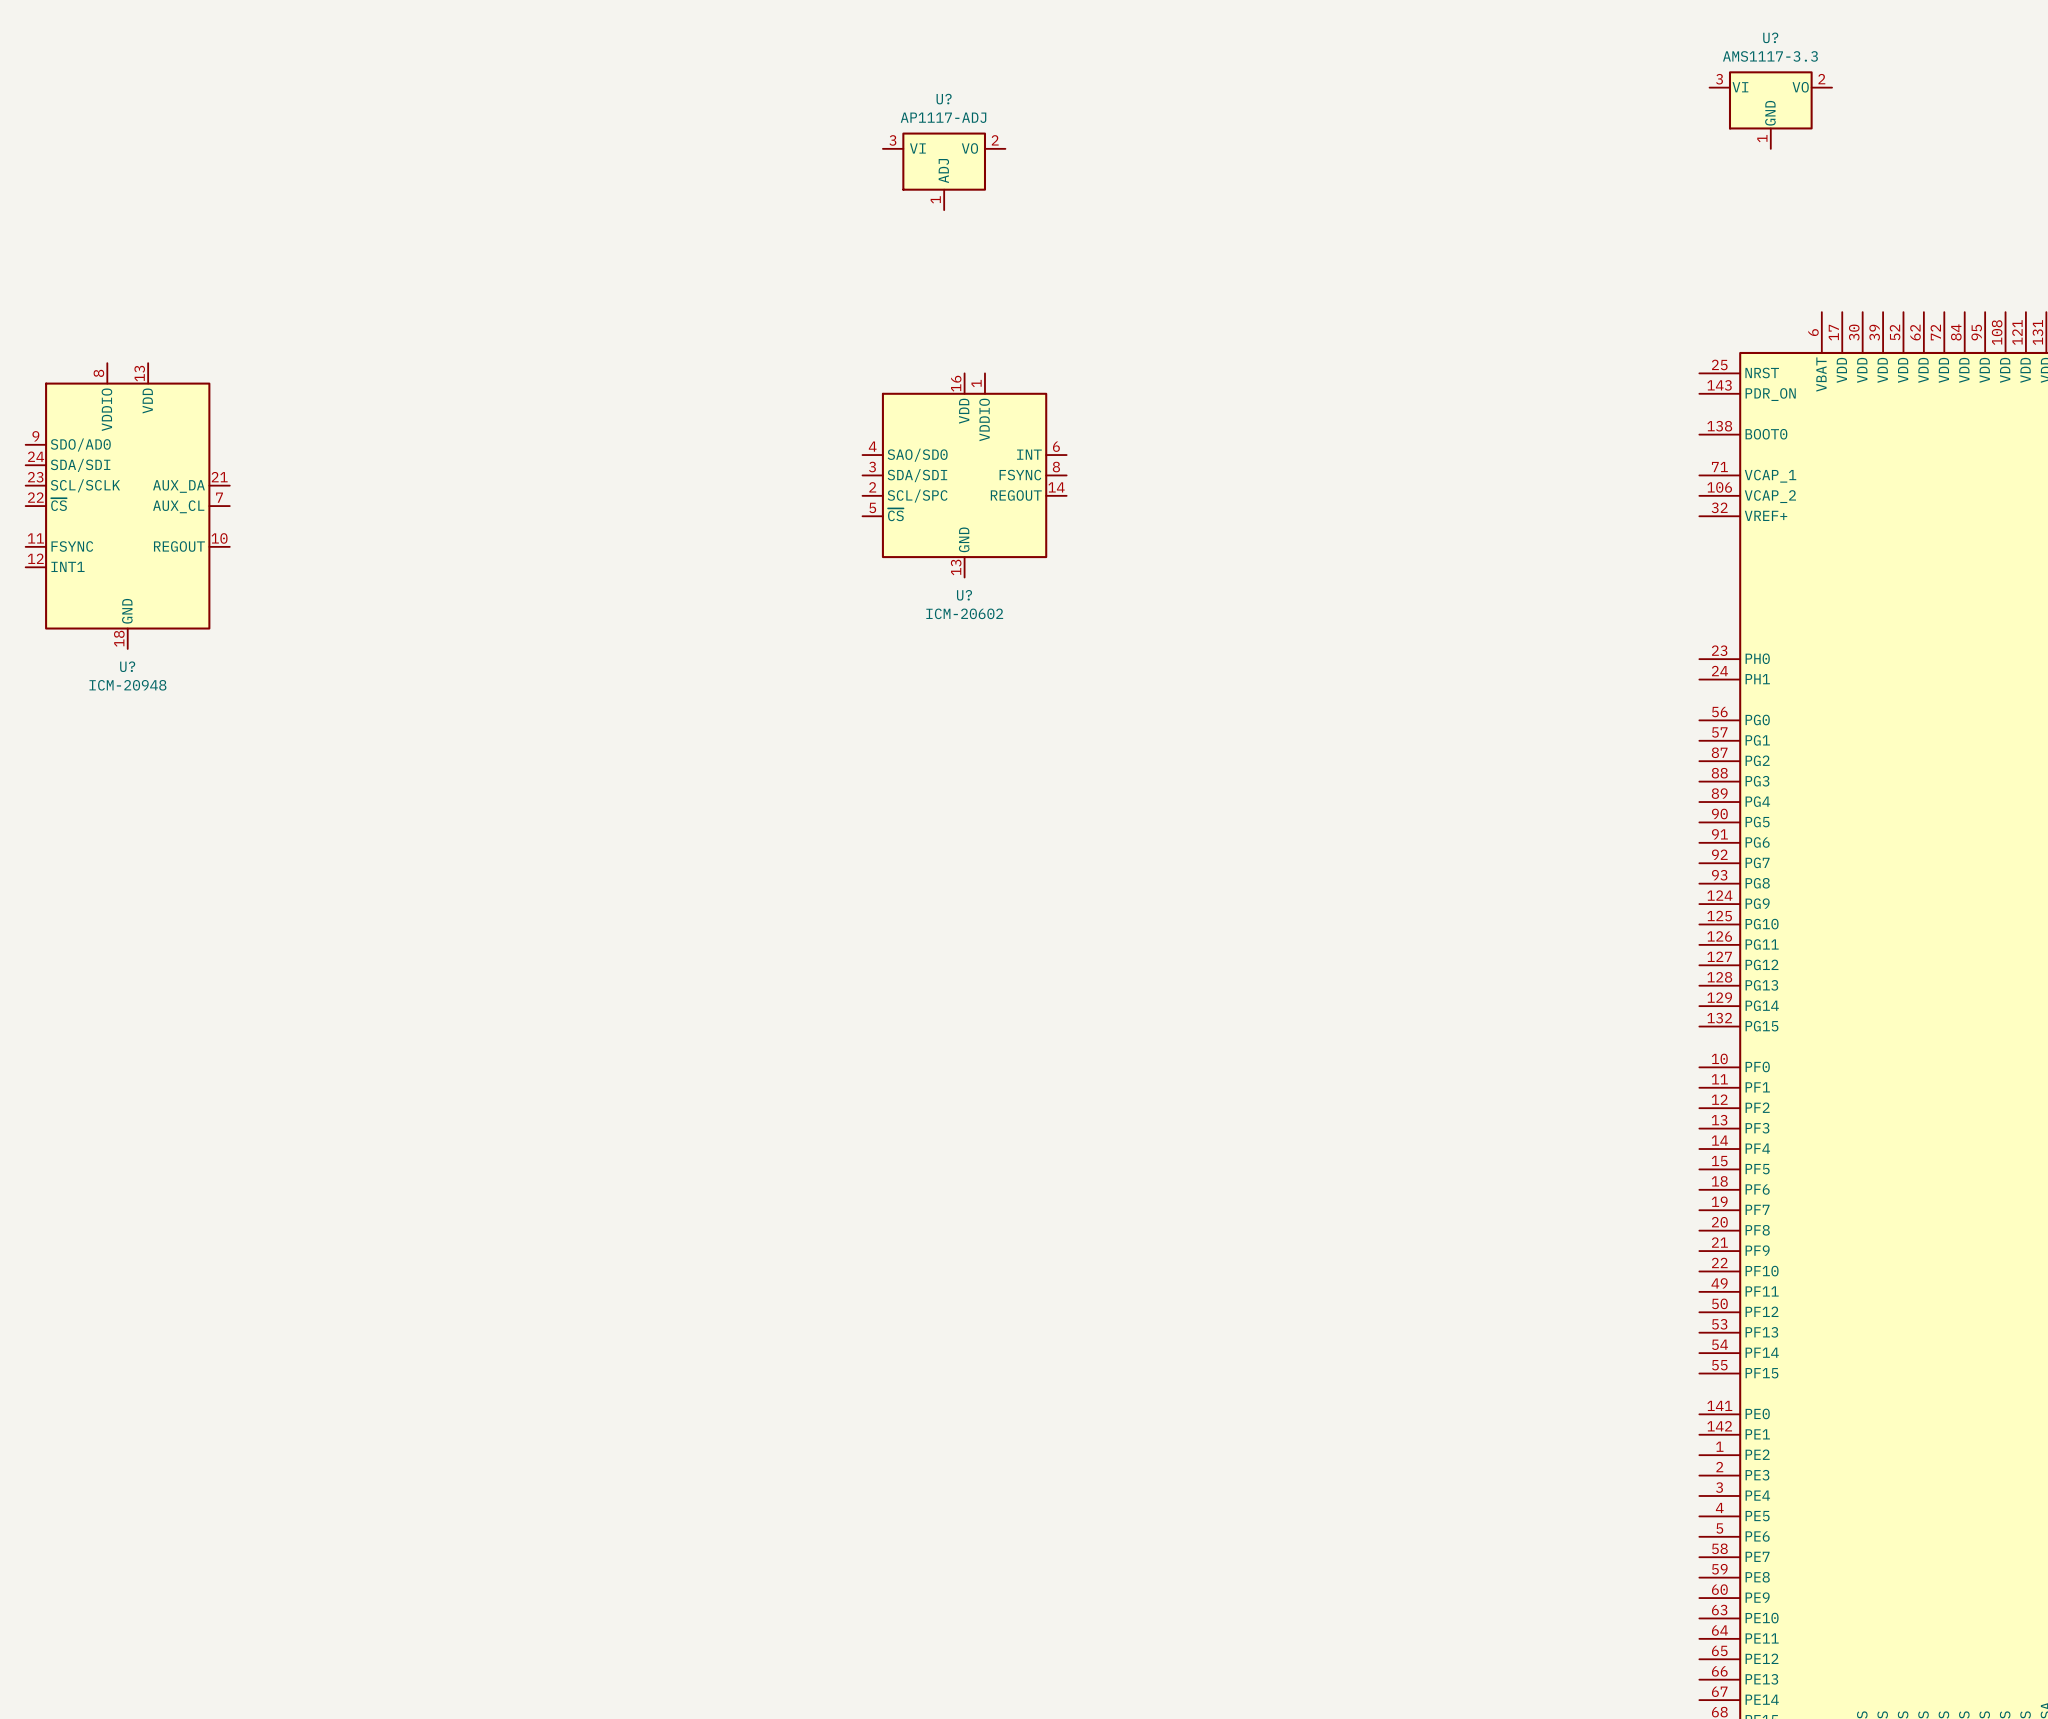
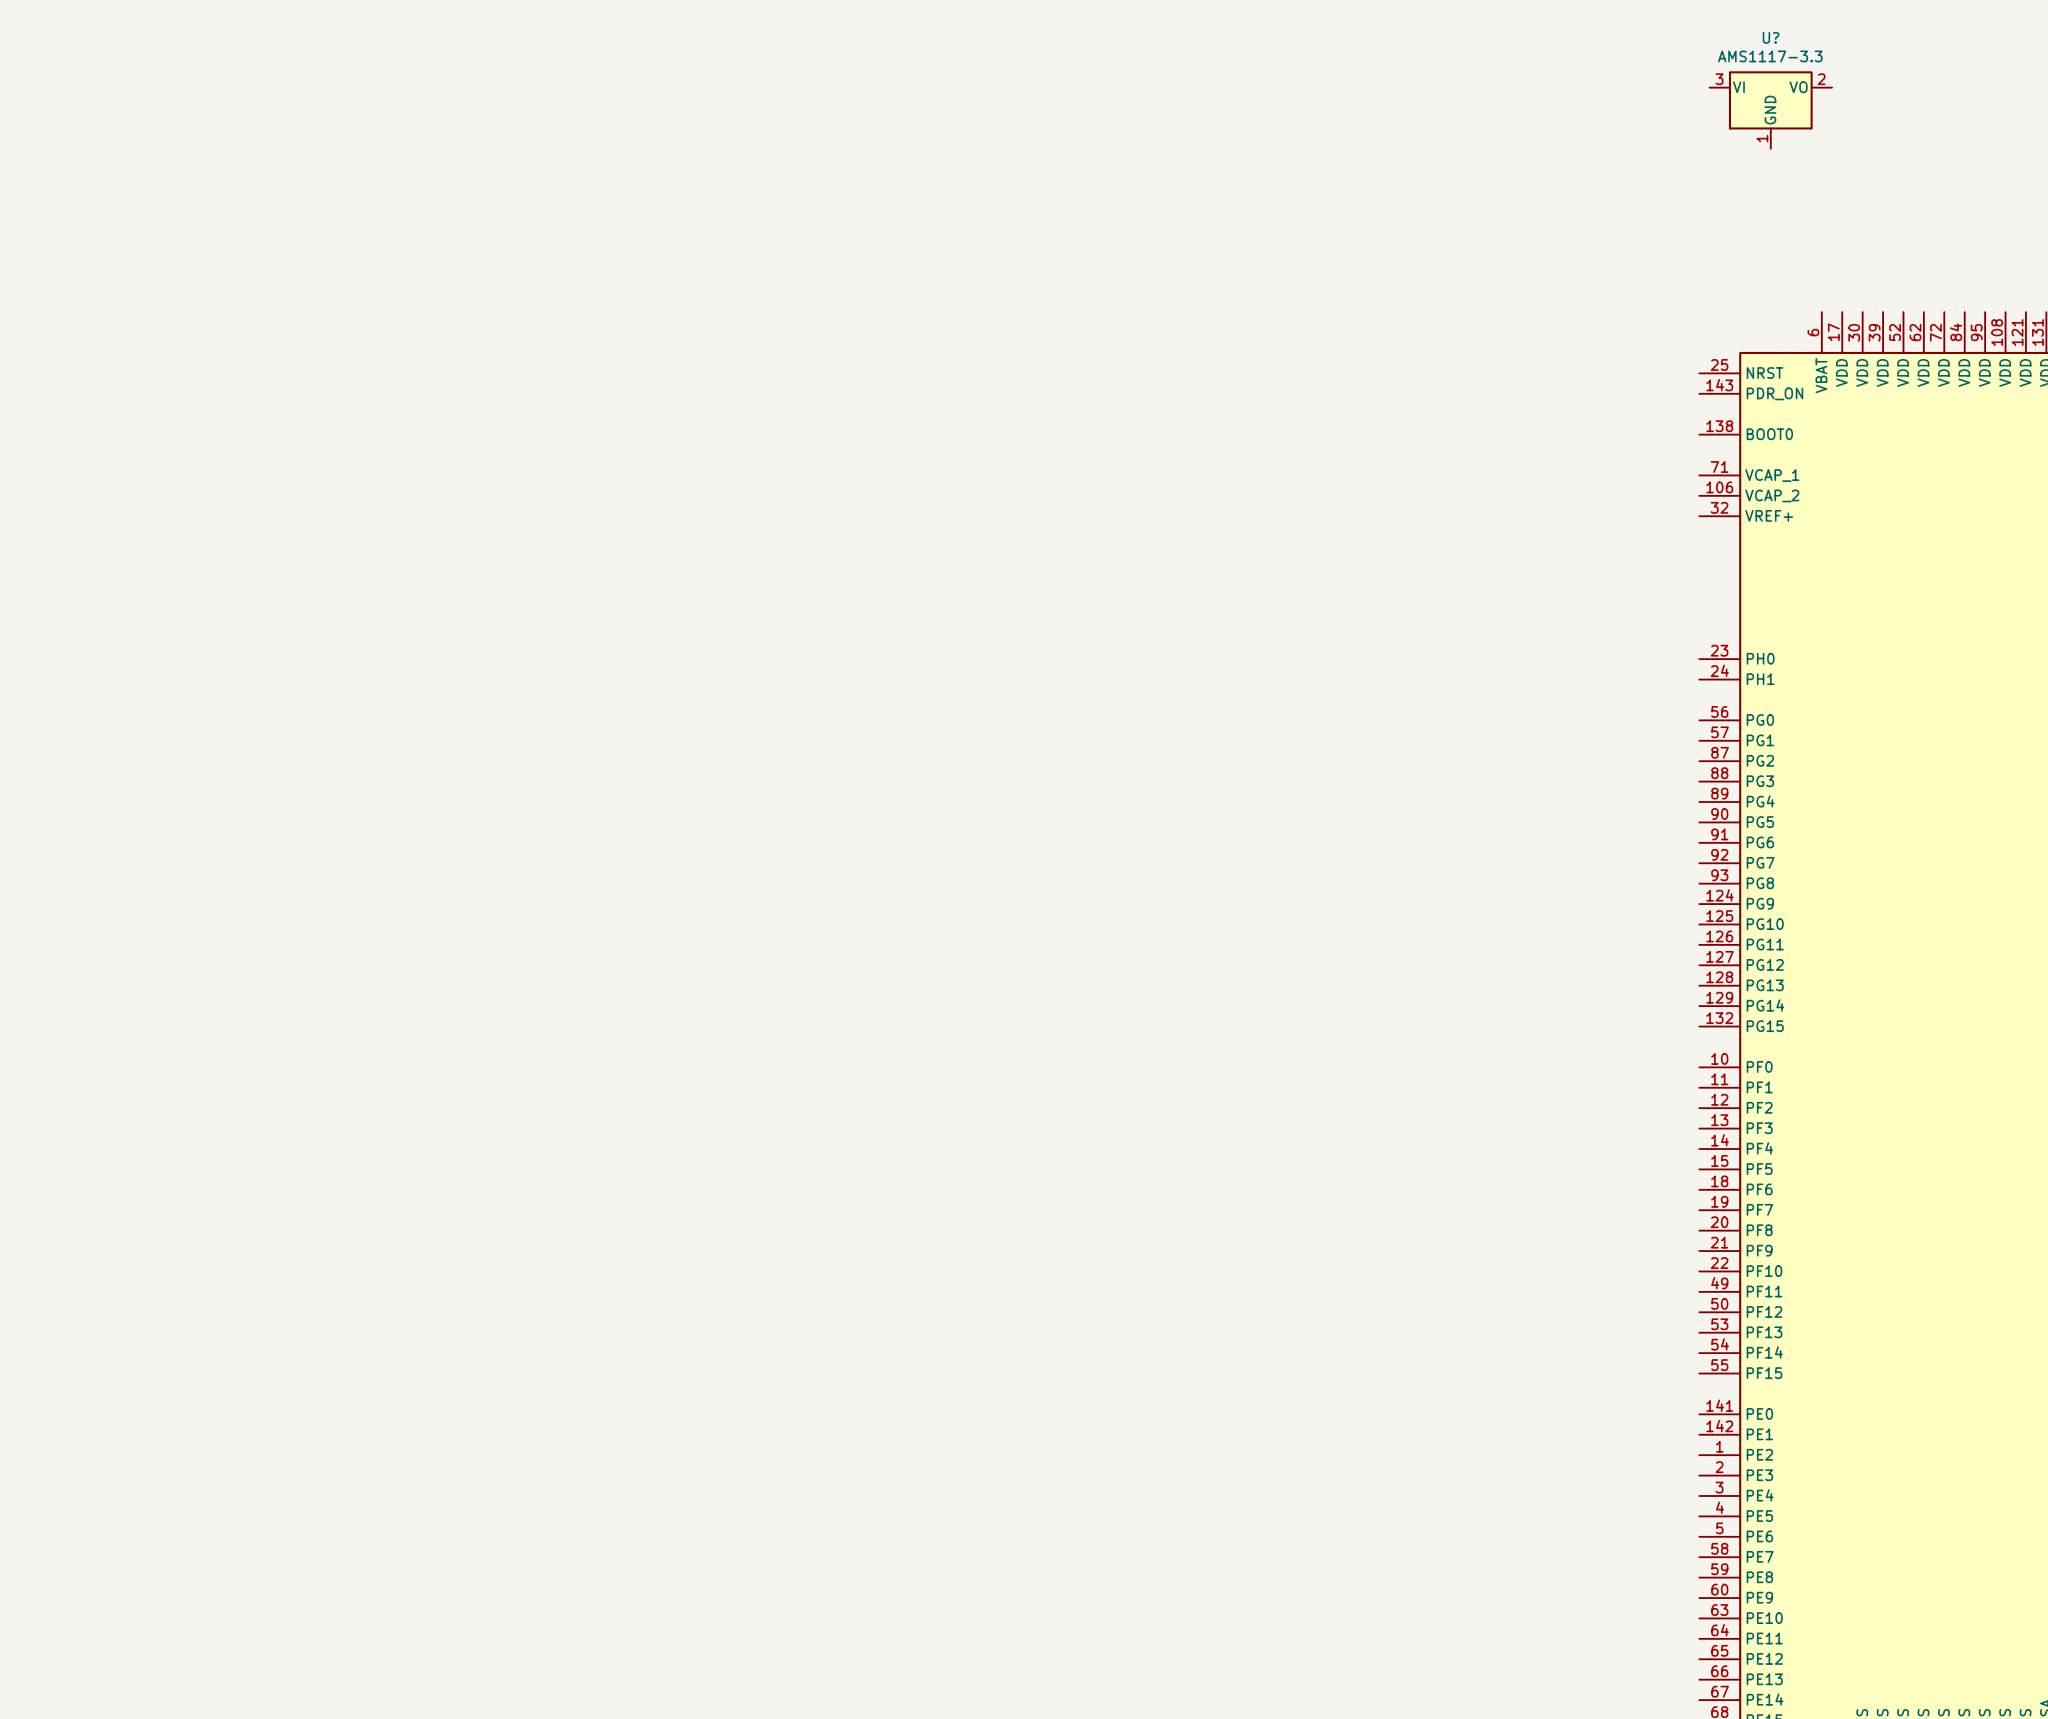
U?: AP1117-ADJ (944, 171) -> none
U?: ICM-20602 (964, 475) -> none
U?: ICM-20948 (127, 506) -> none

